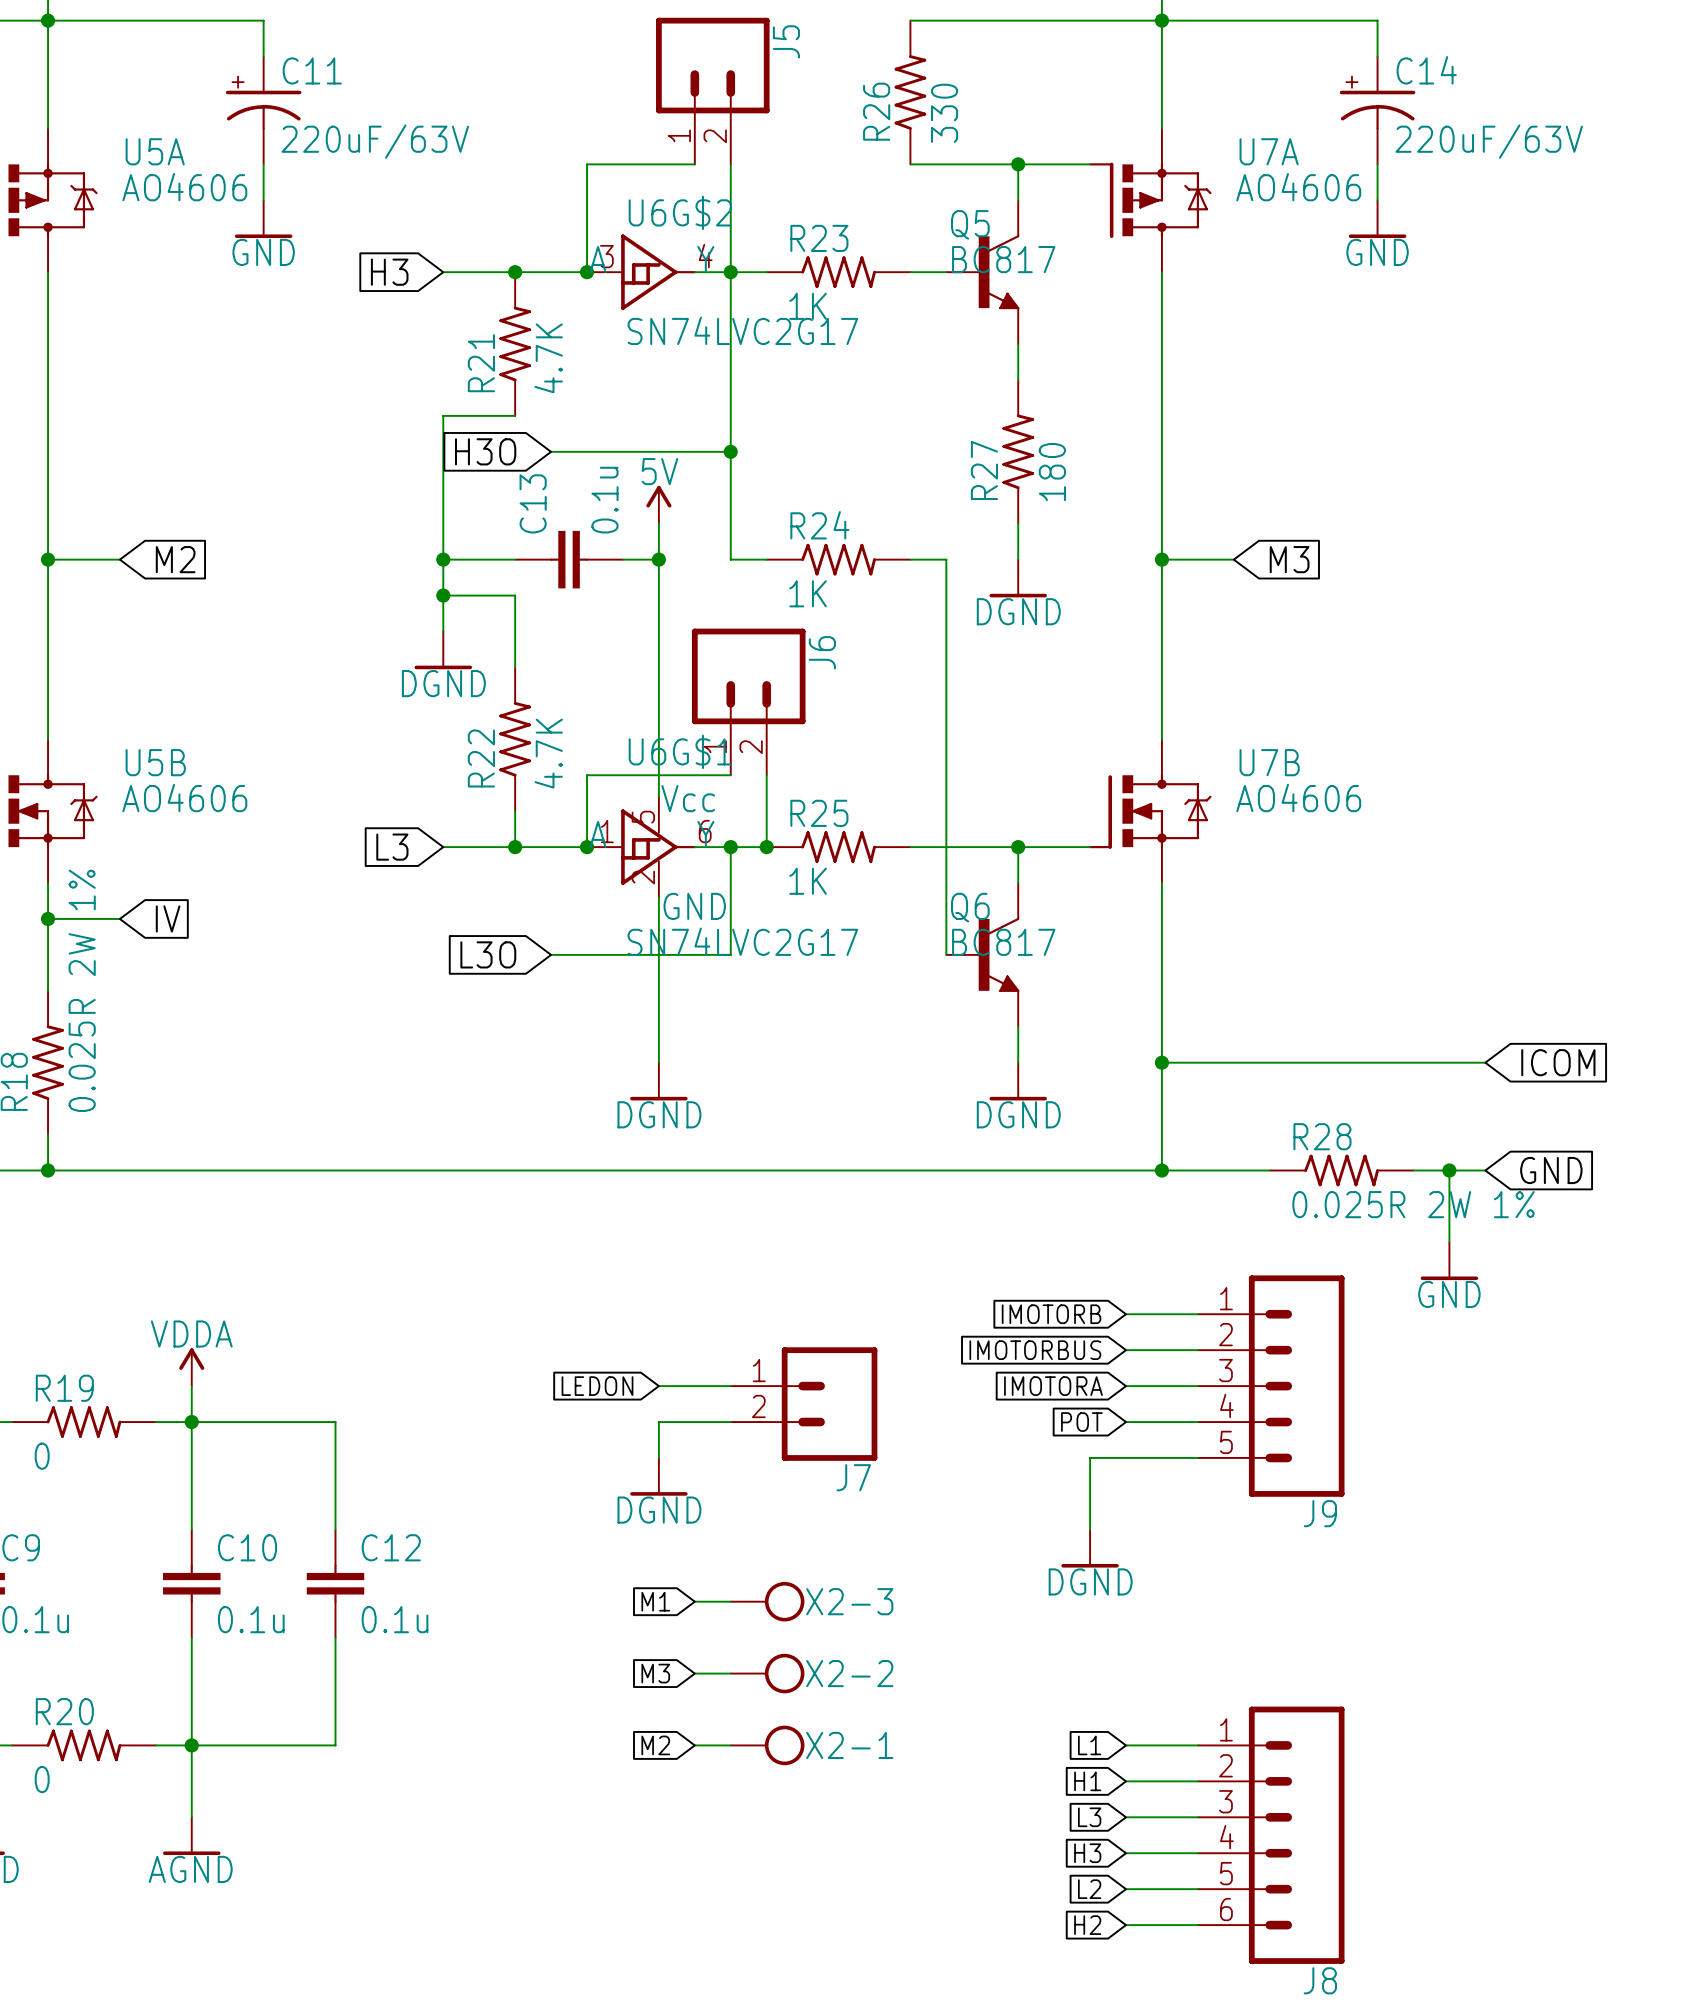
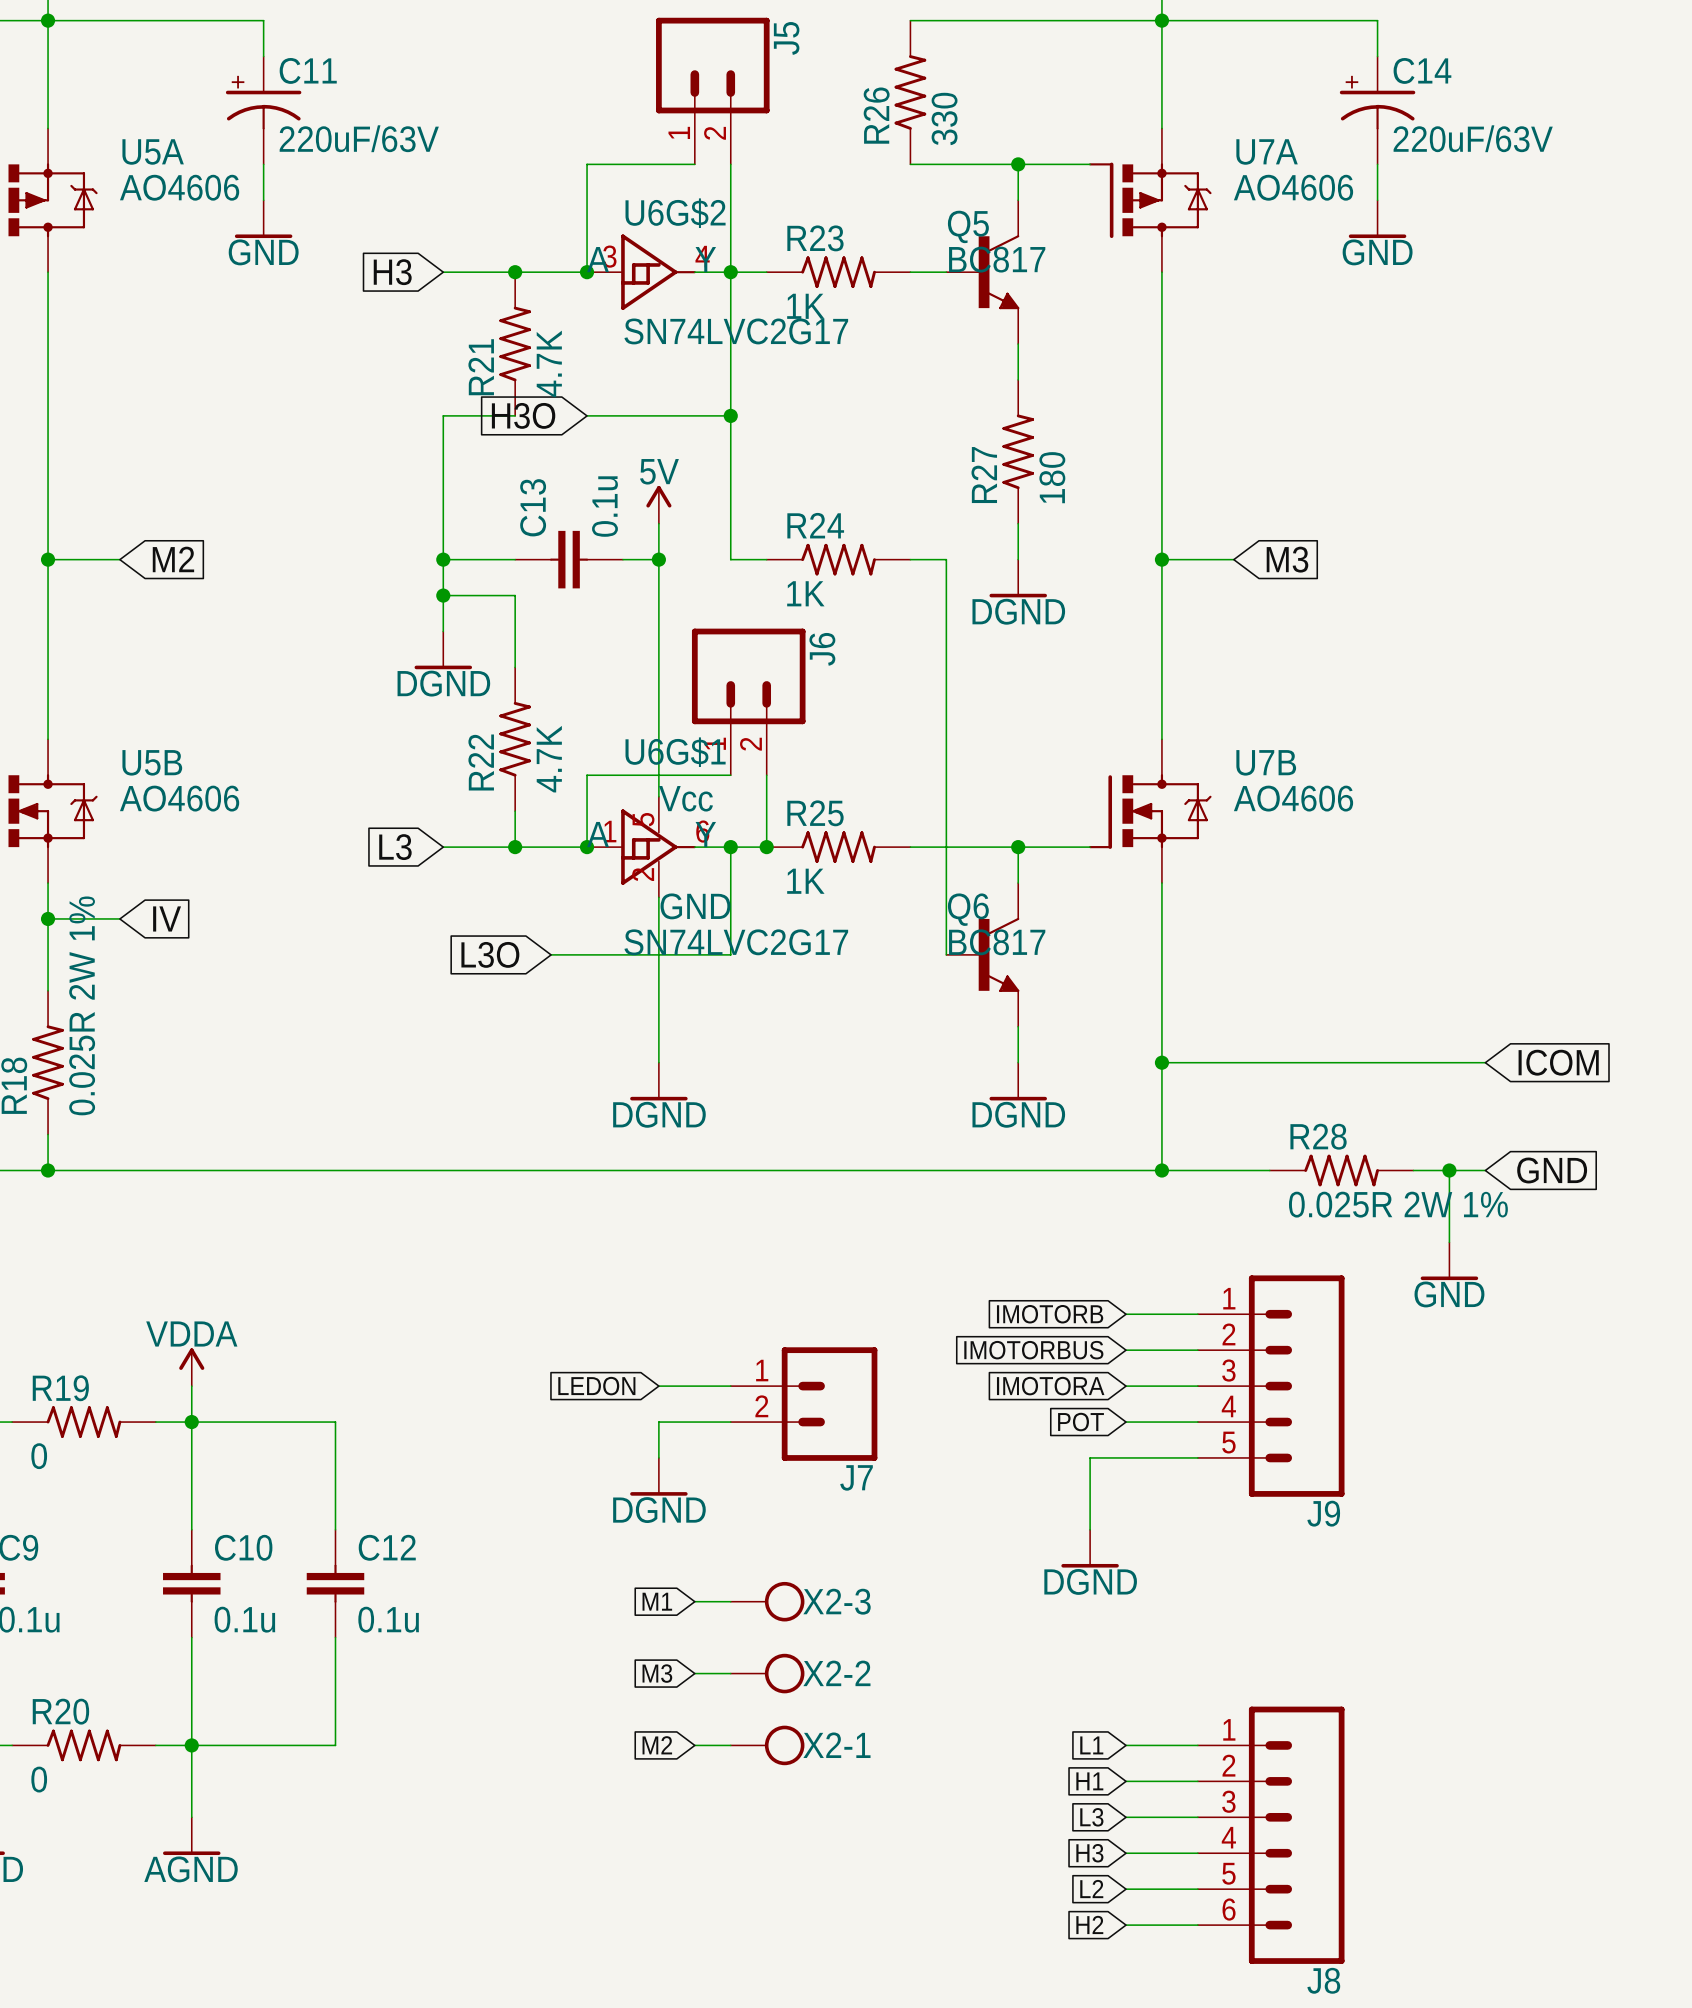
wire: none -> (587, 415) (730, 415)
global label position: H3O (485, 451) -> H3O (523, 415)
wire: (551, 451) (730, 451) -> none
junction position: (730, 451) -> (730, 415)

